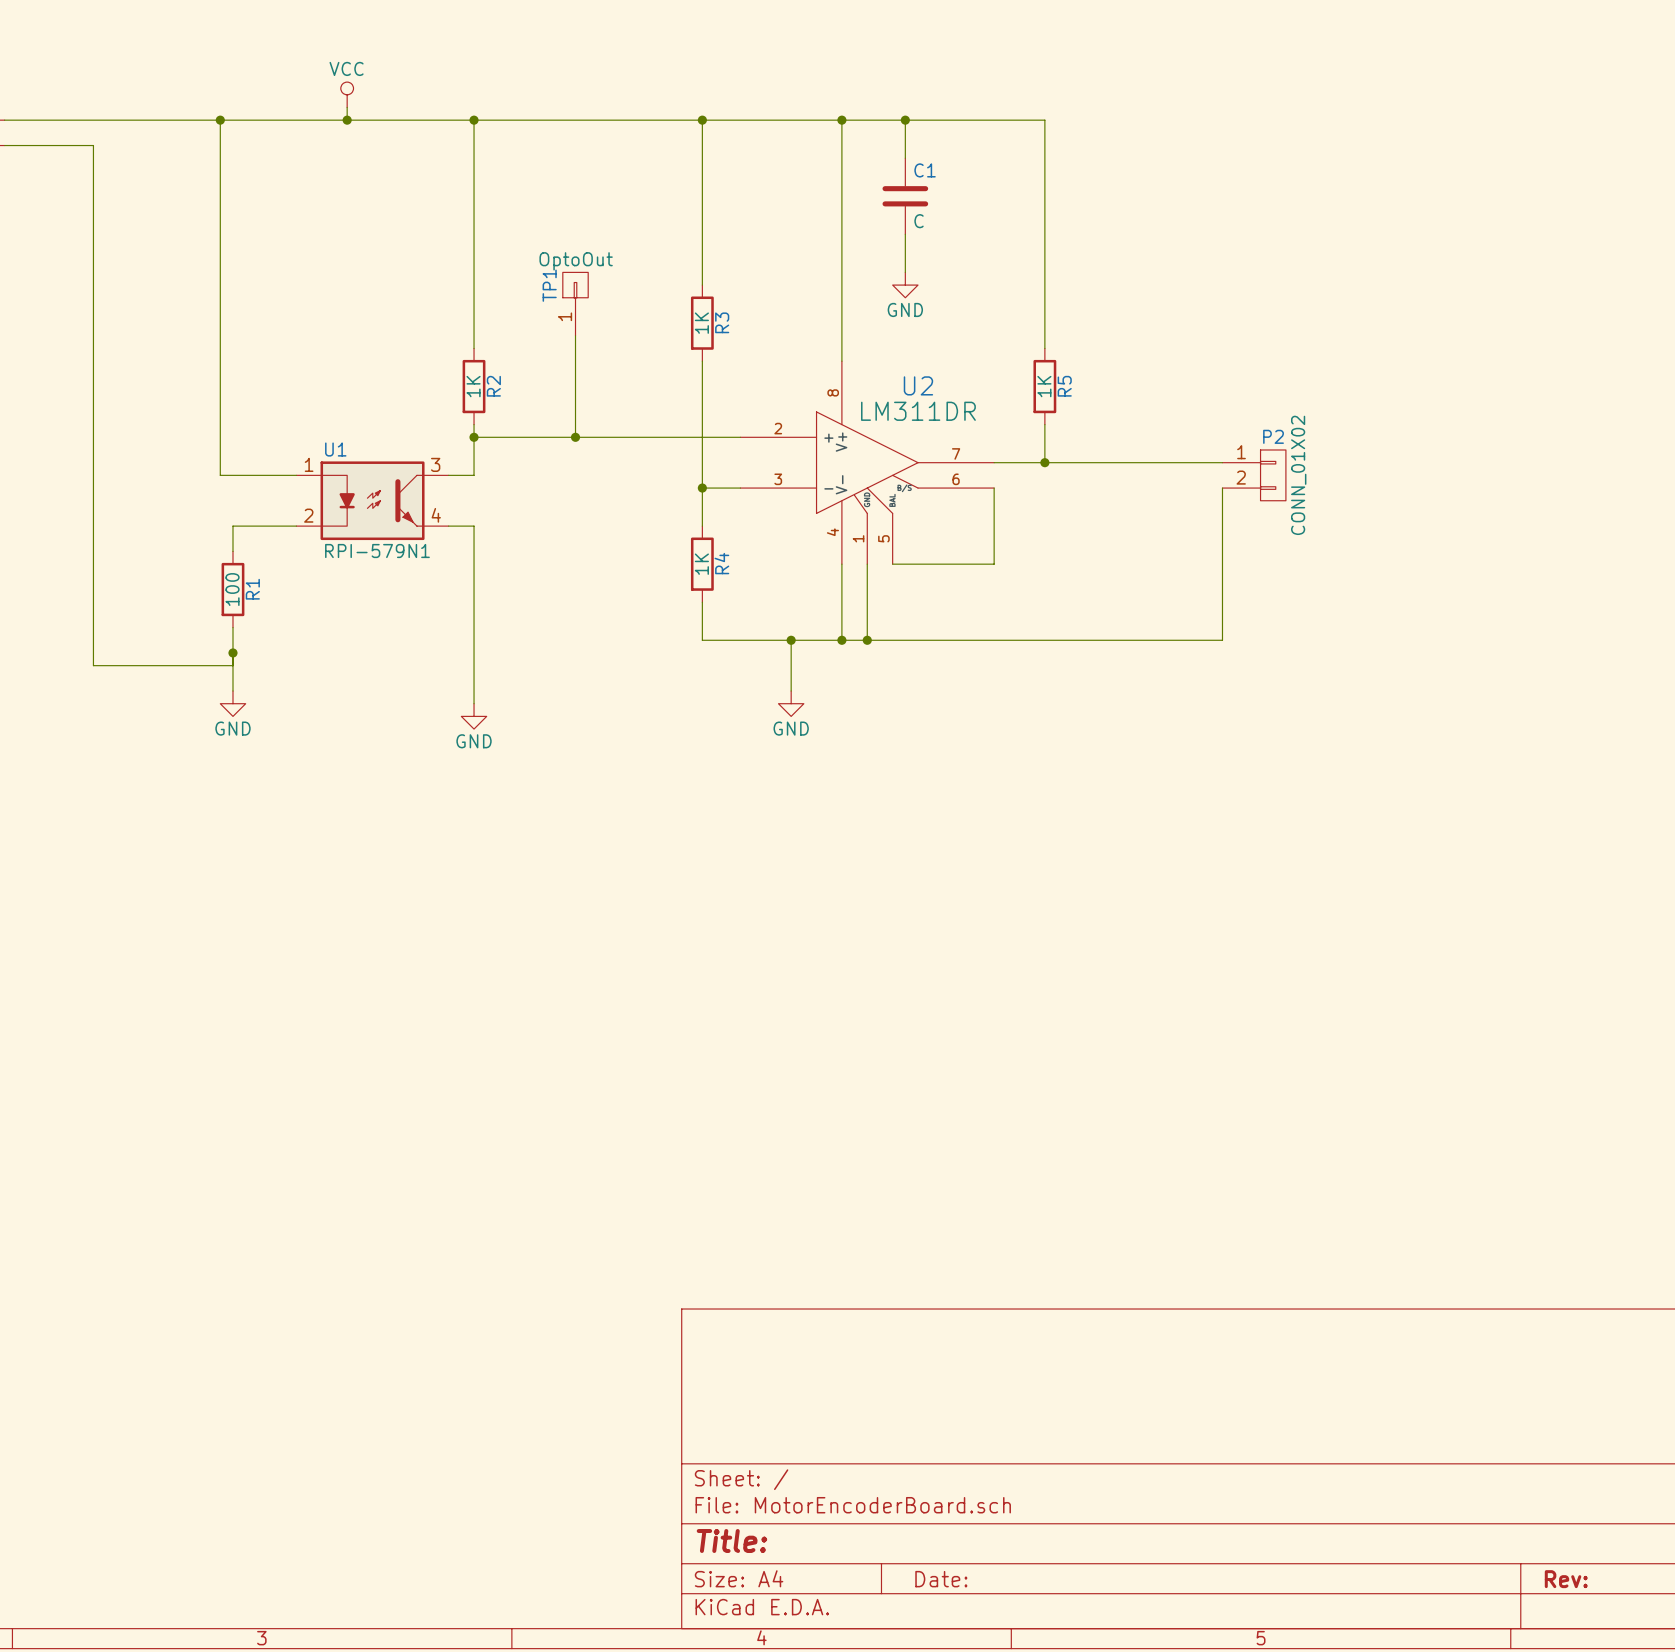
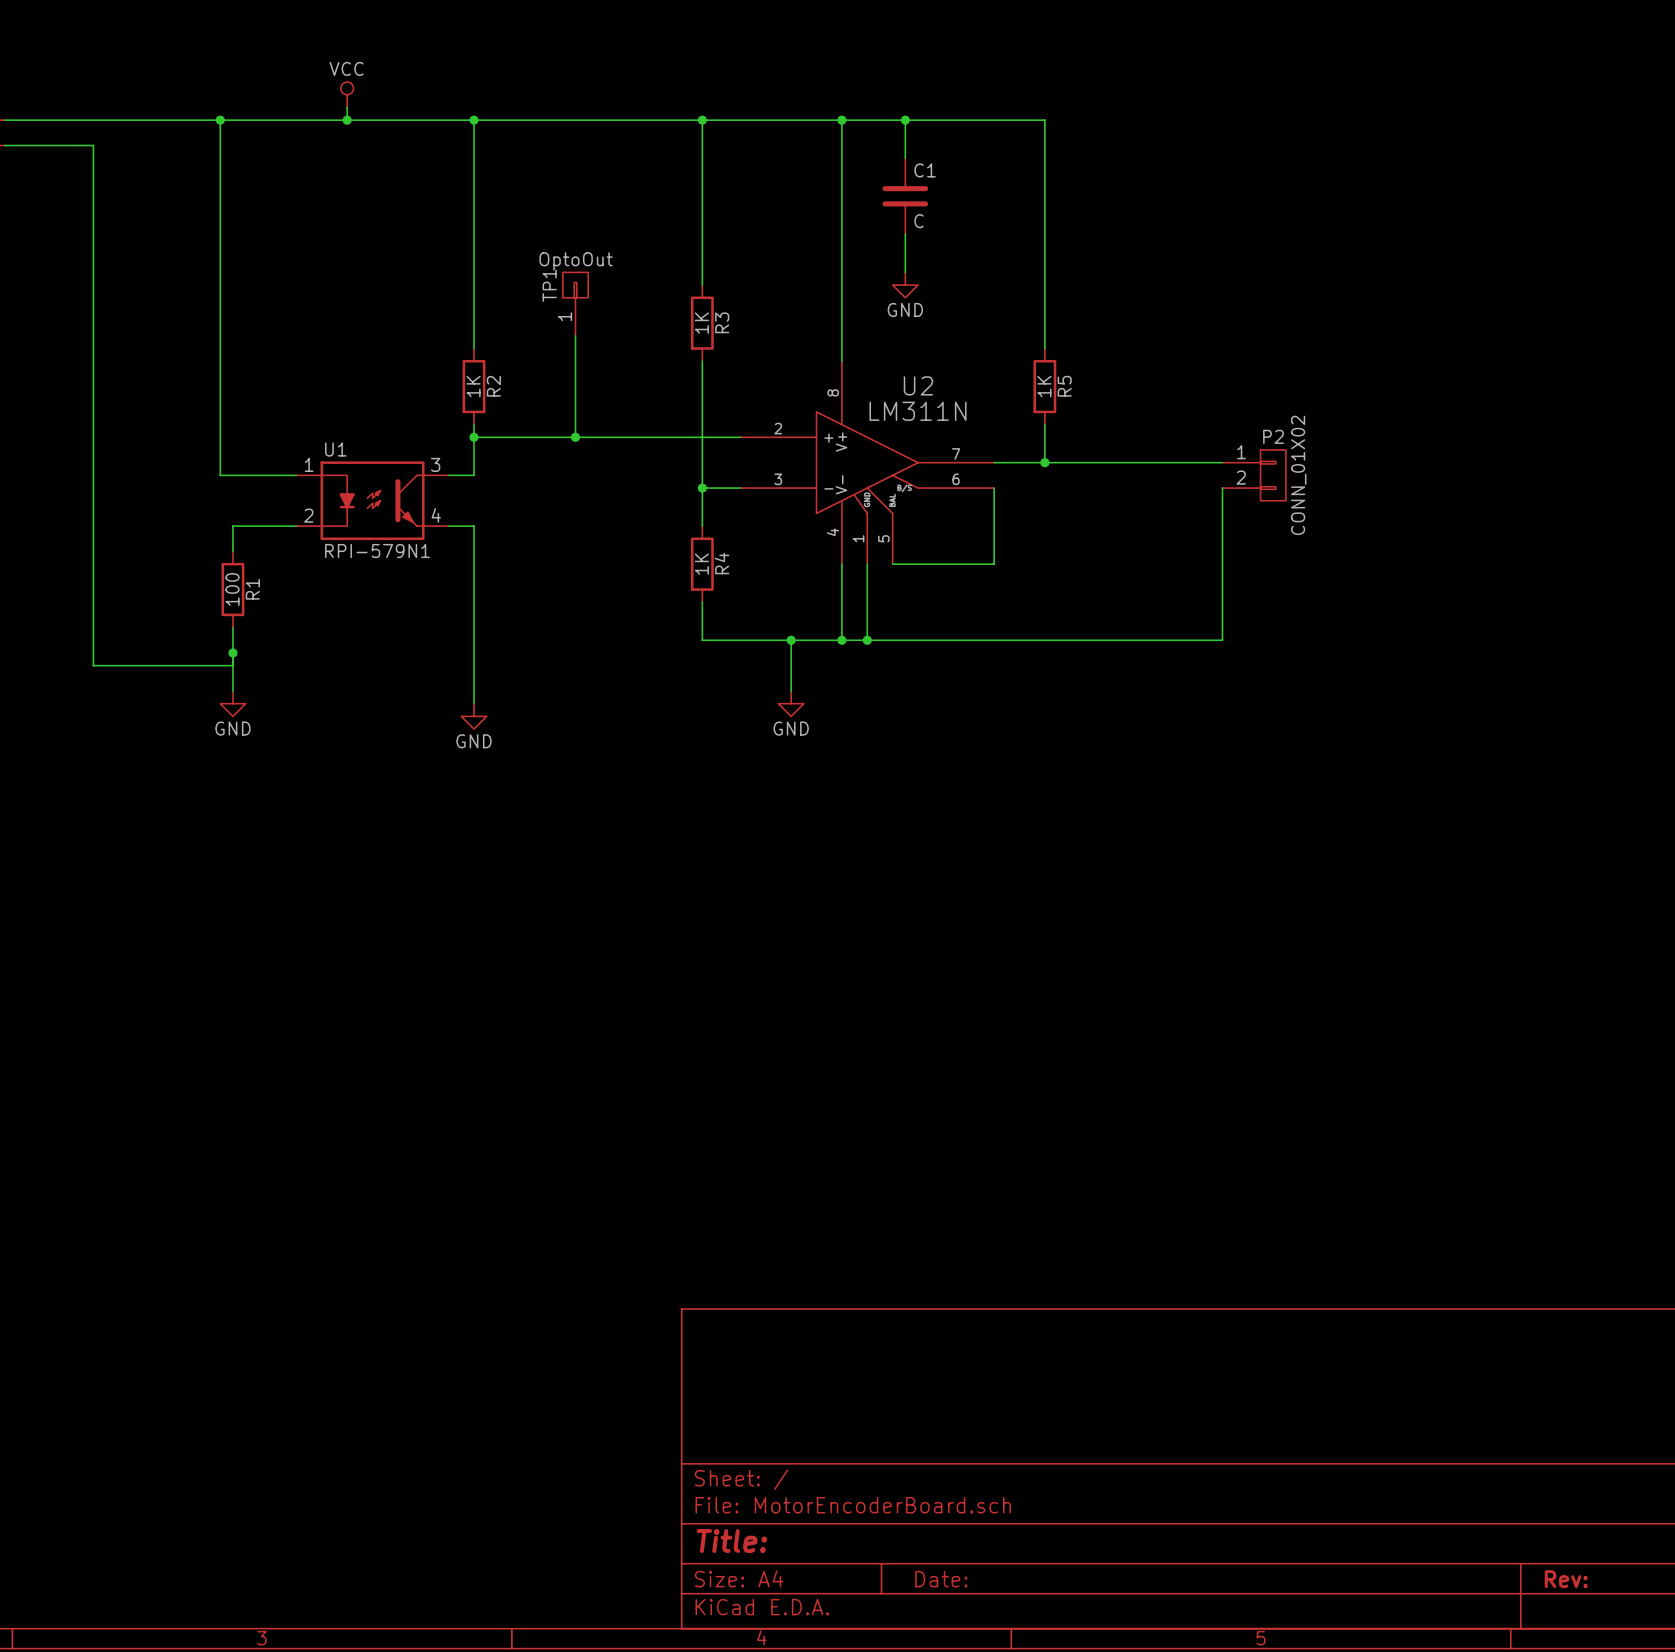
U2 value: LM311DR (918, 411) -> LM311N (918, 411)

